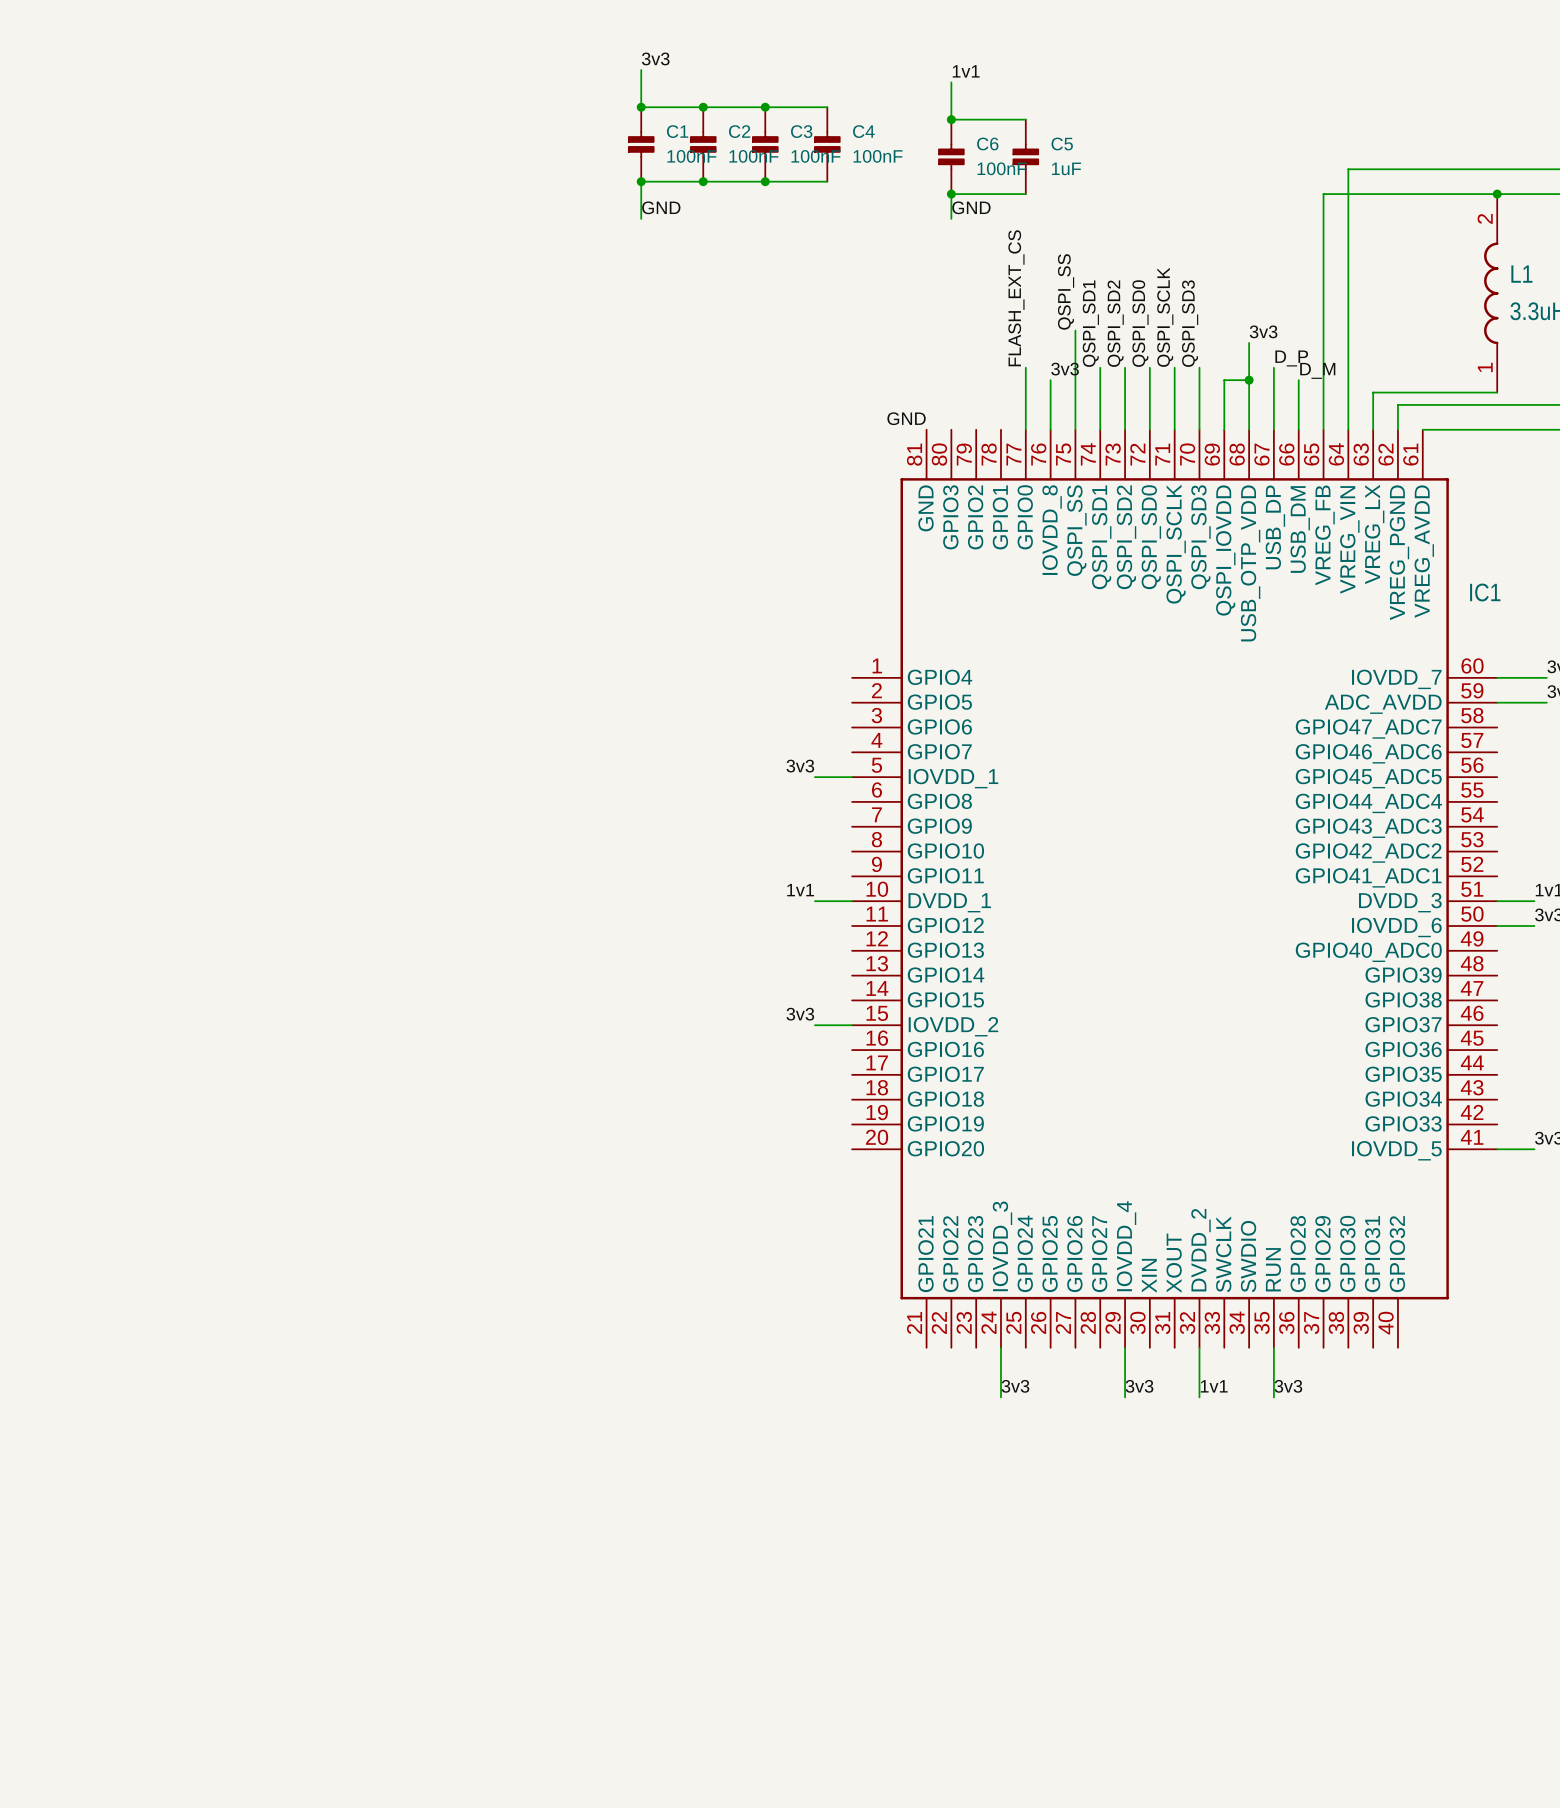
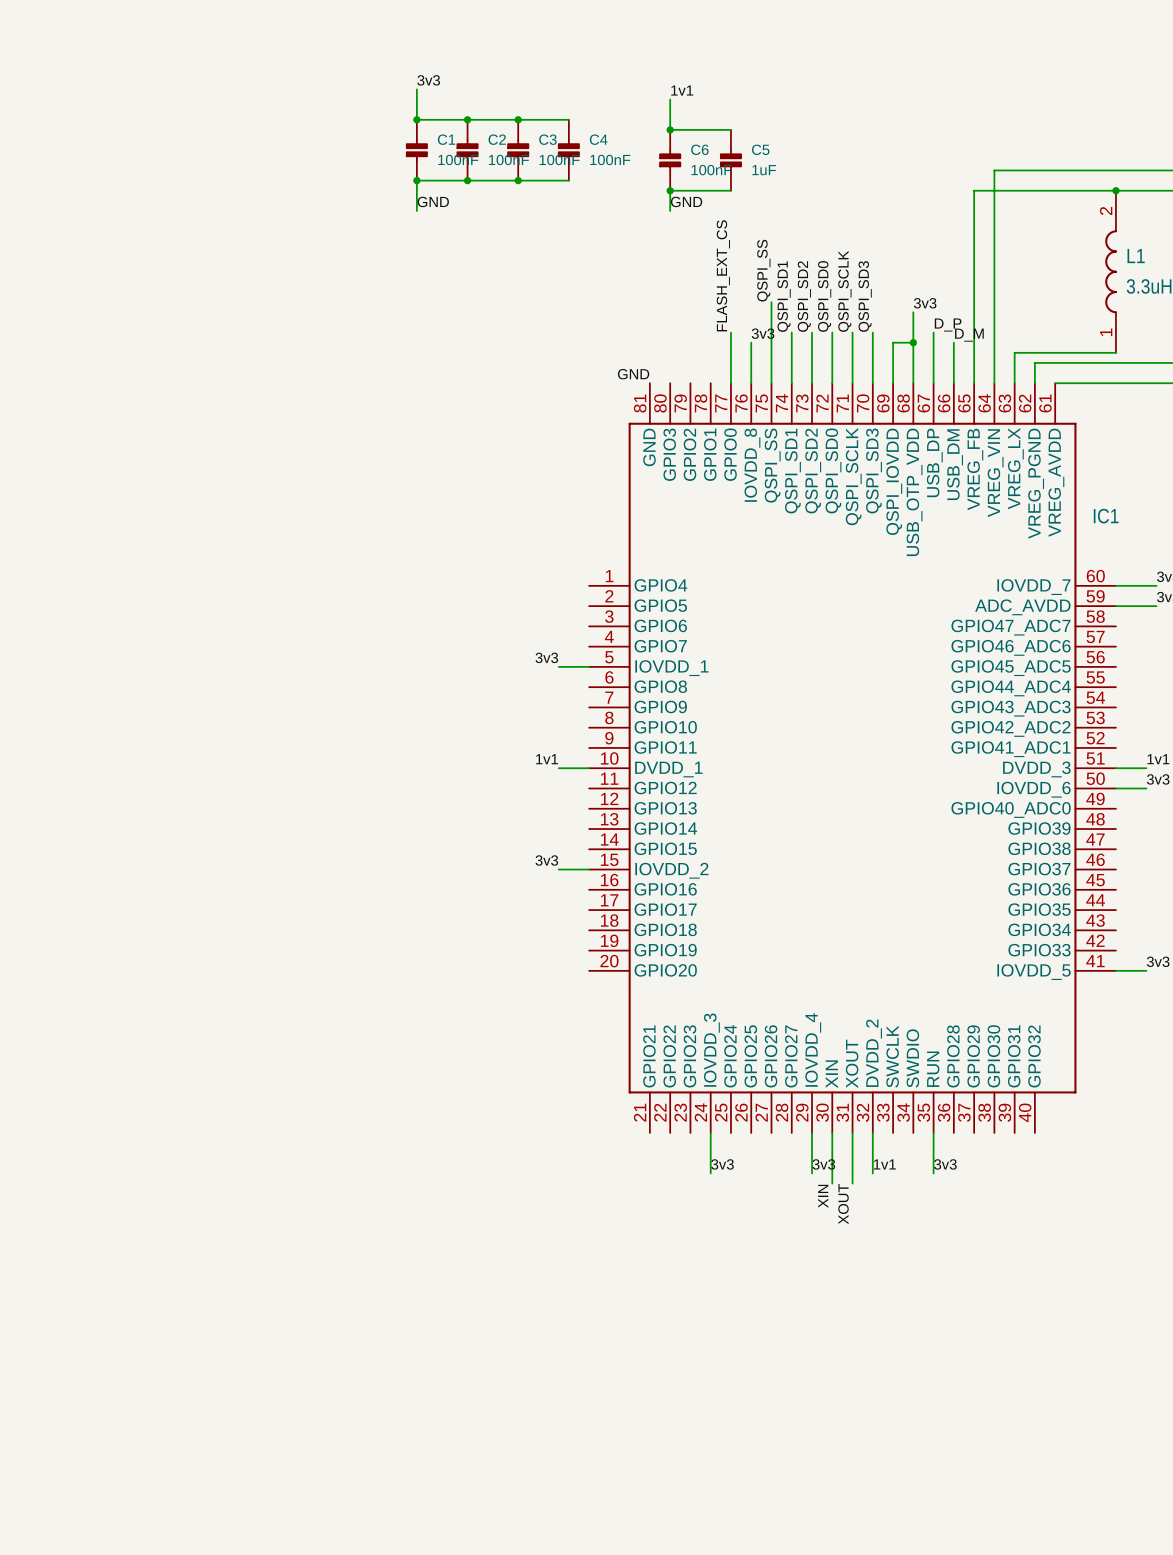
wire: none -> (832, 1132) (832, 1183)
wire: none -> (852, 1132) (852, 1183)
label: none -> XIN (823, 1196)
label: none -> XOUT (843, 1204)

